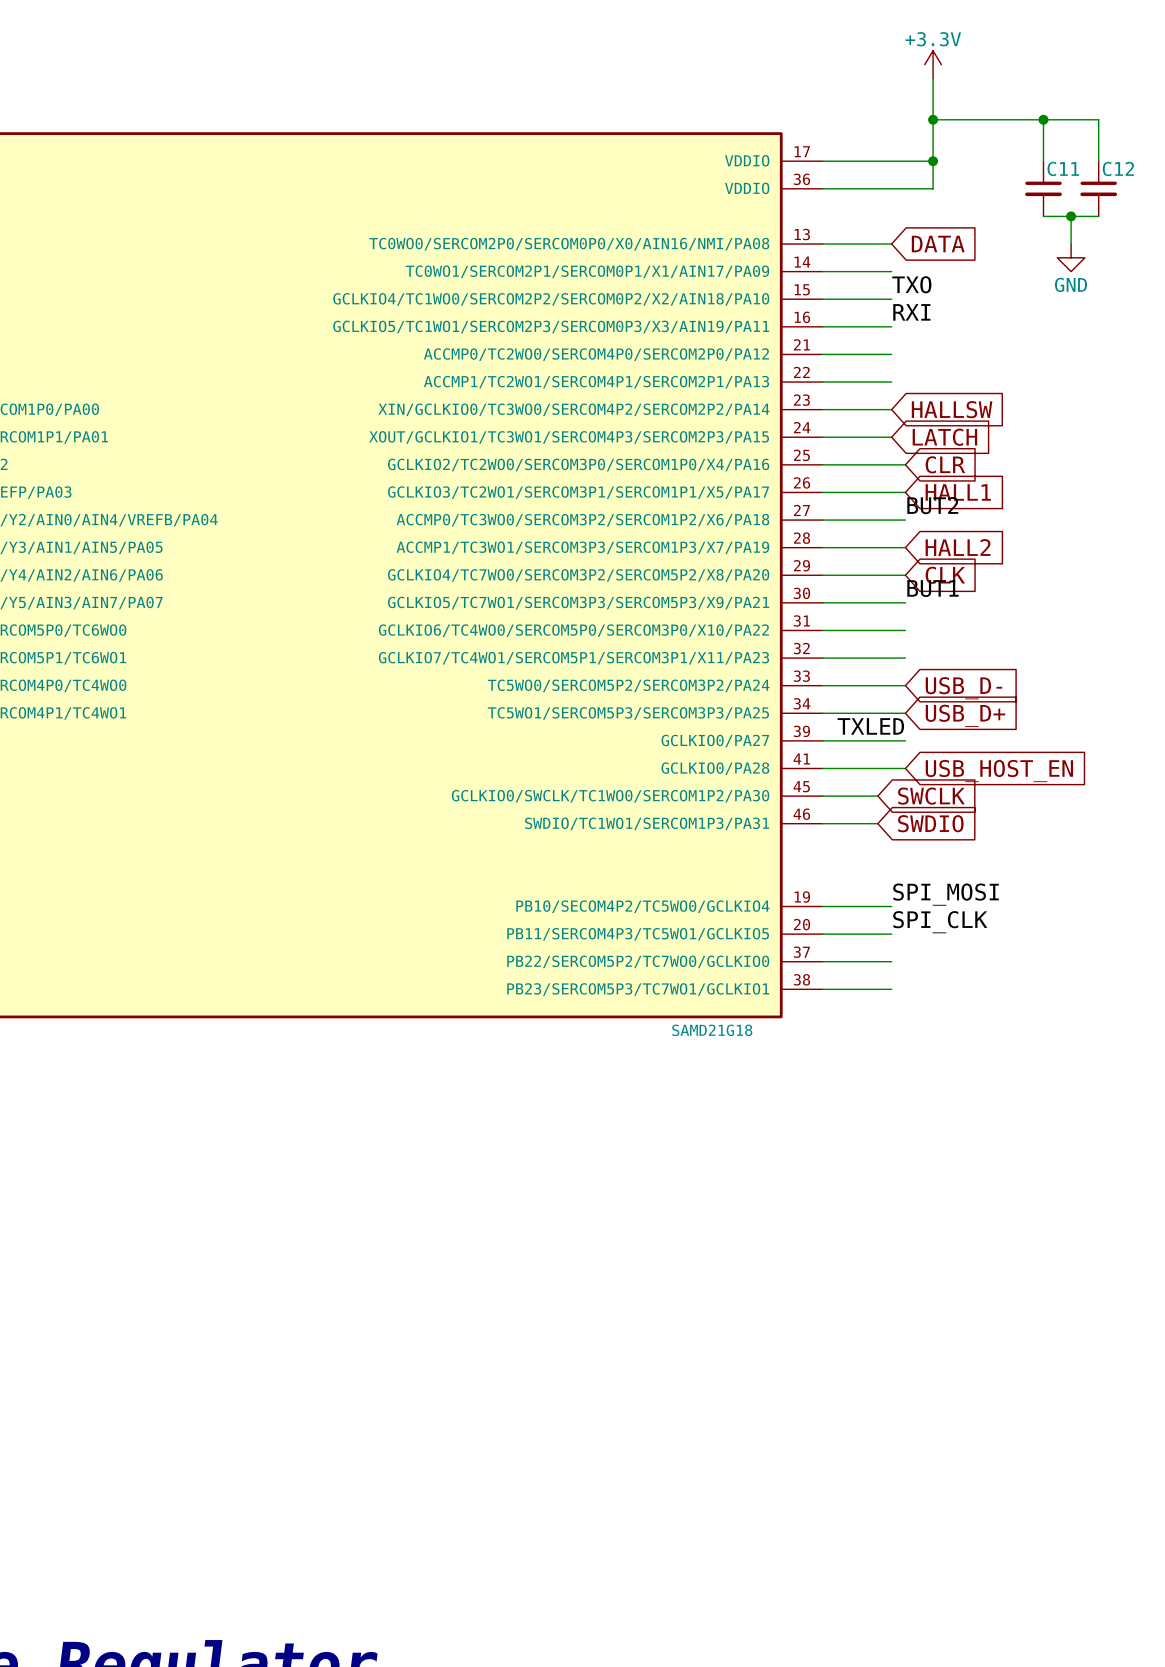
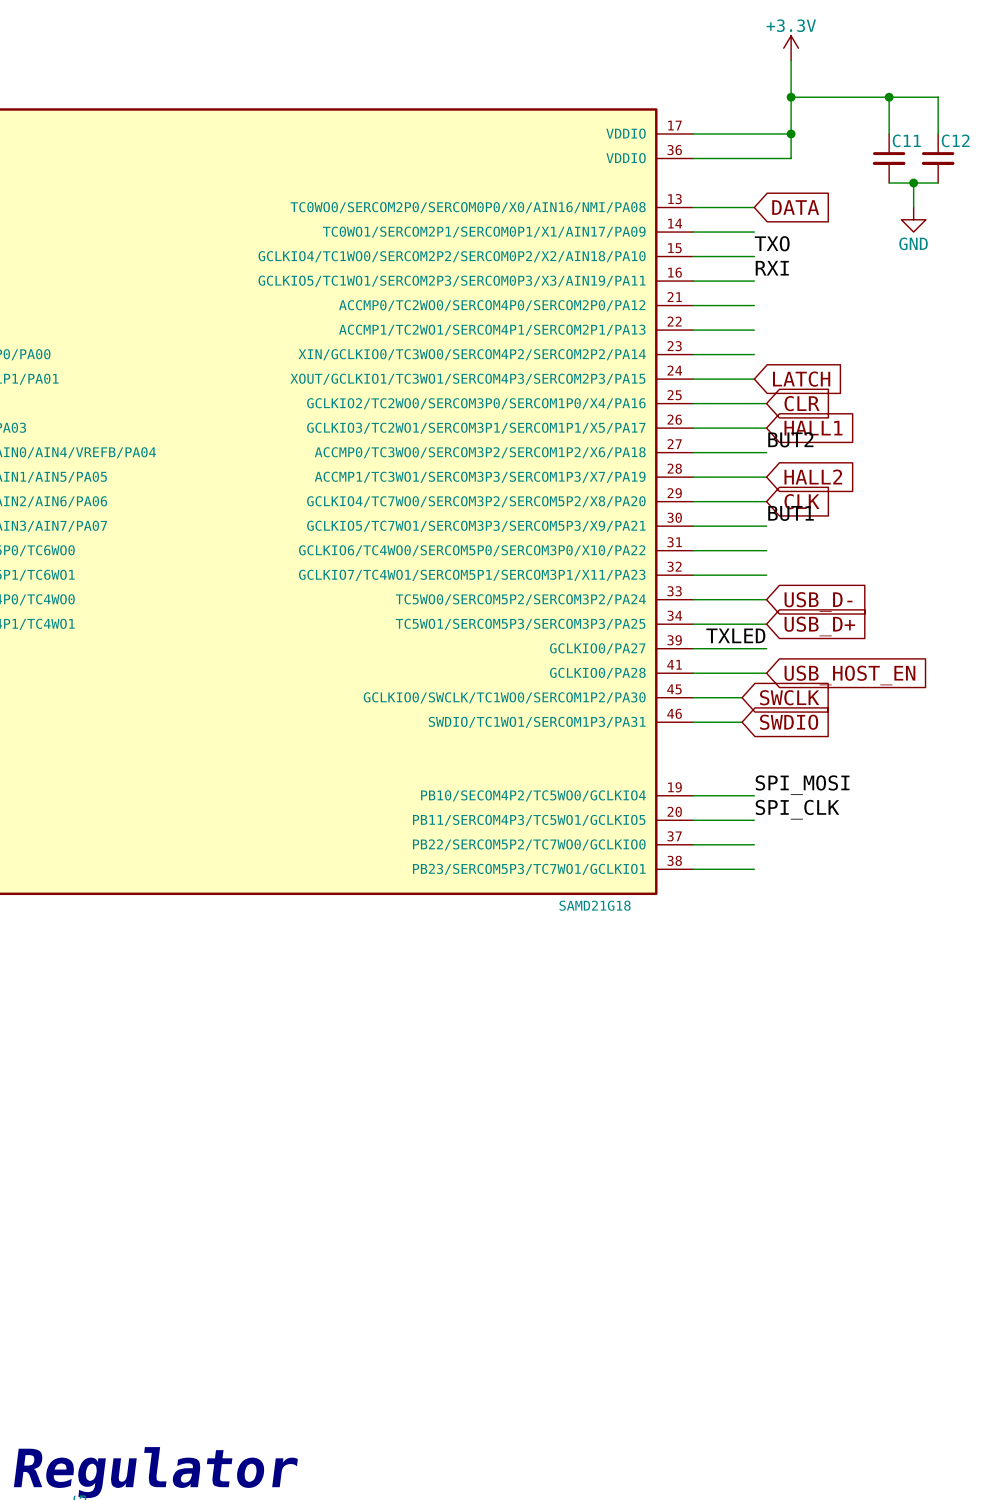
global label: HALLSW (952, 409) -> none

